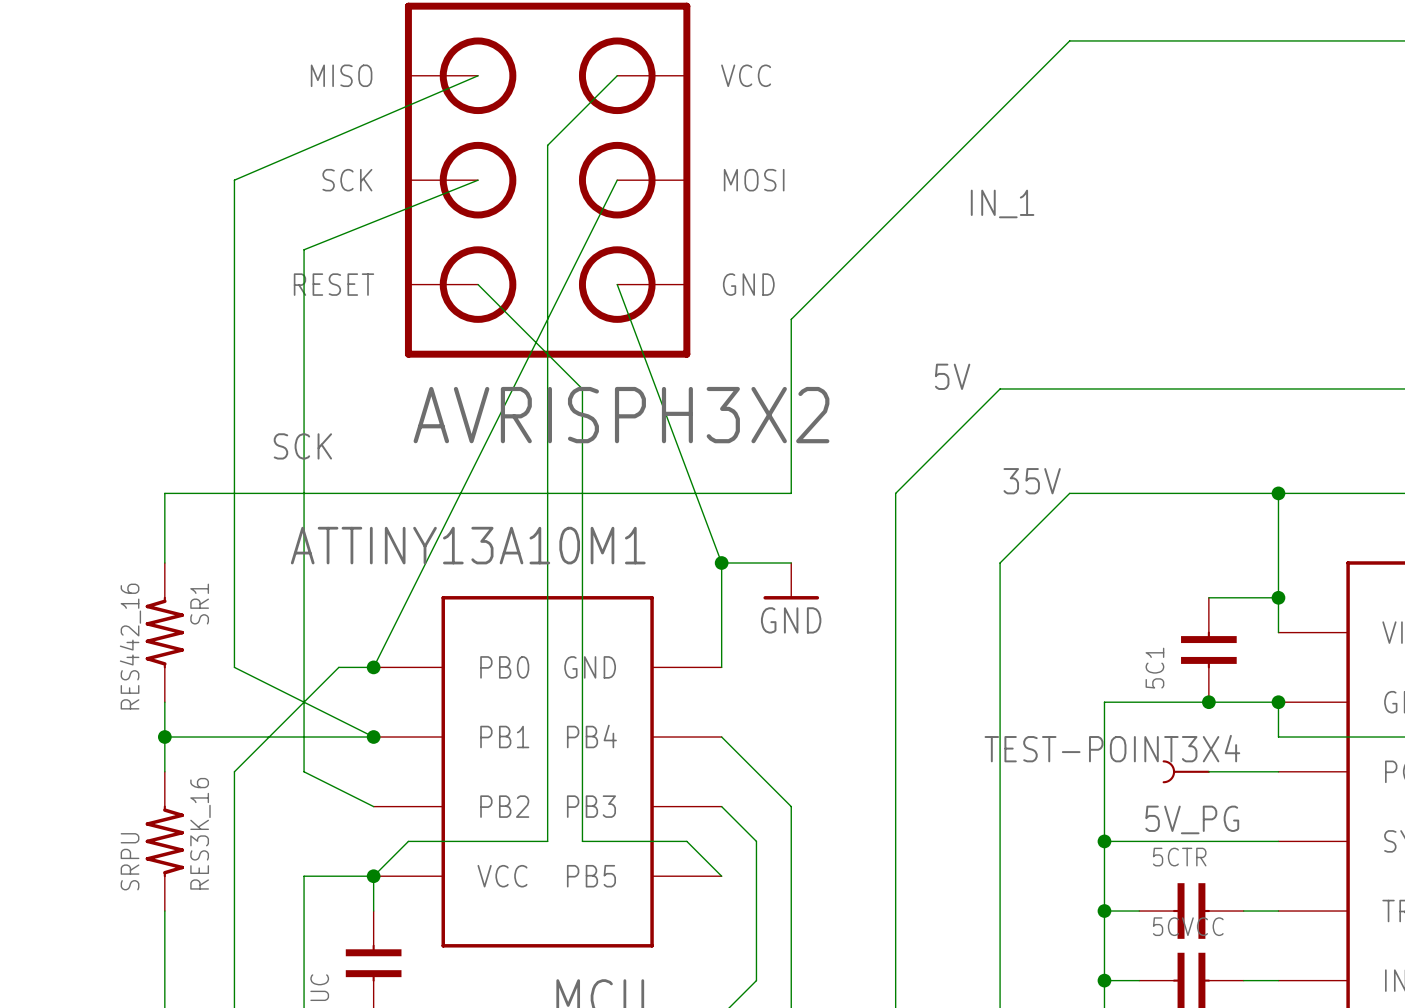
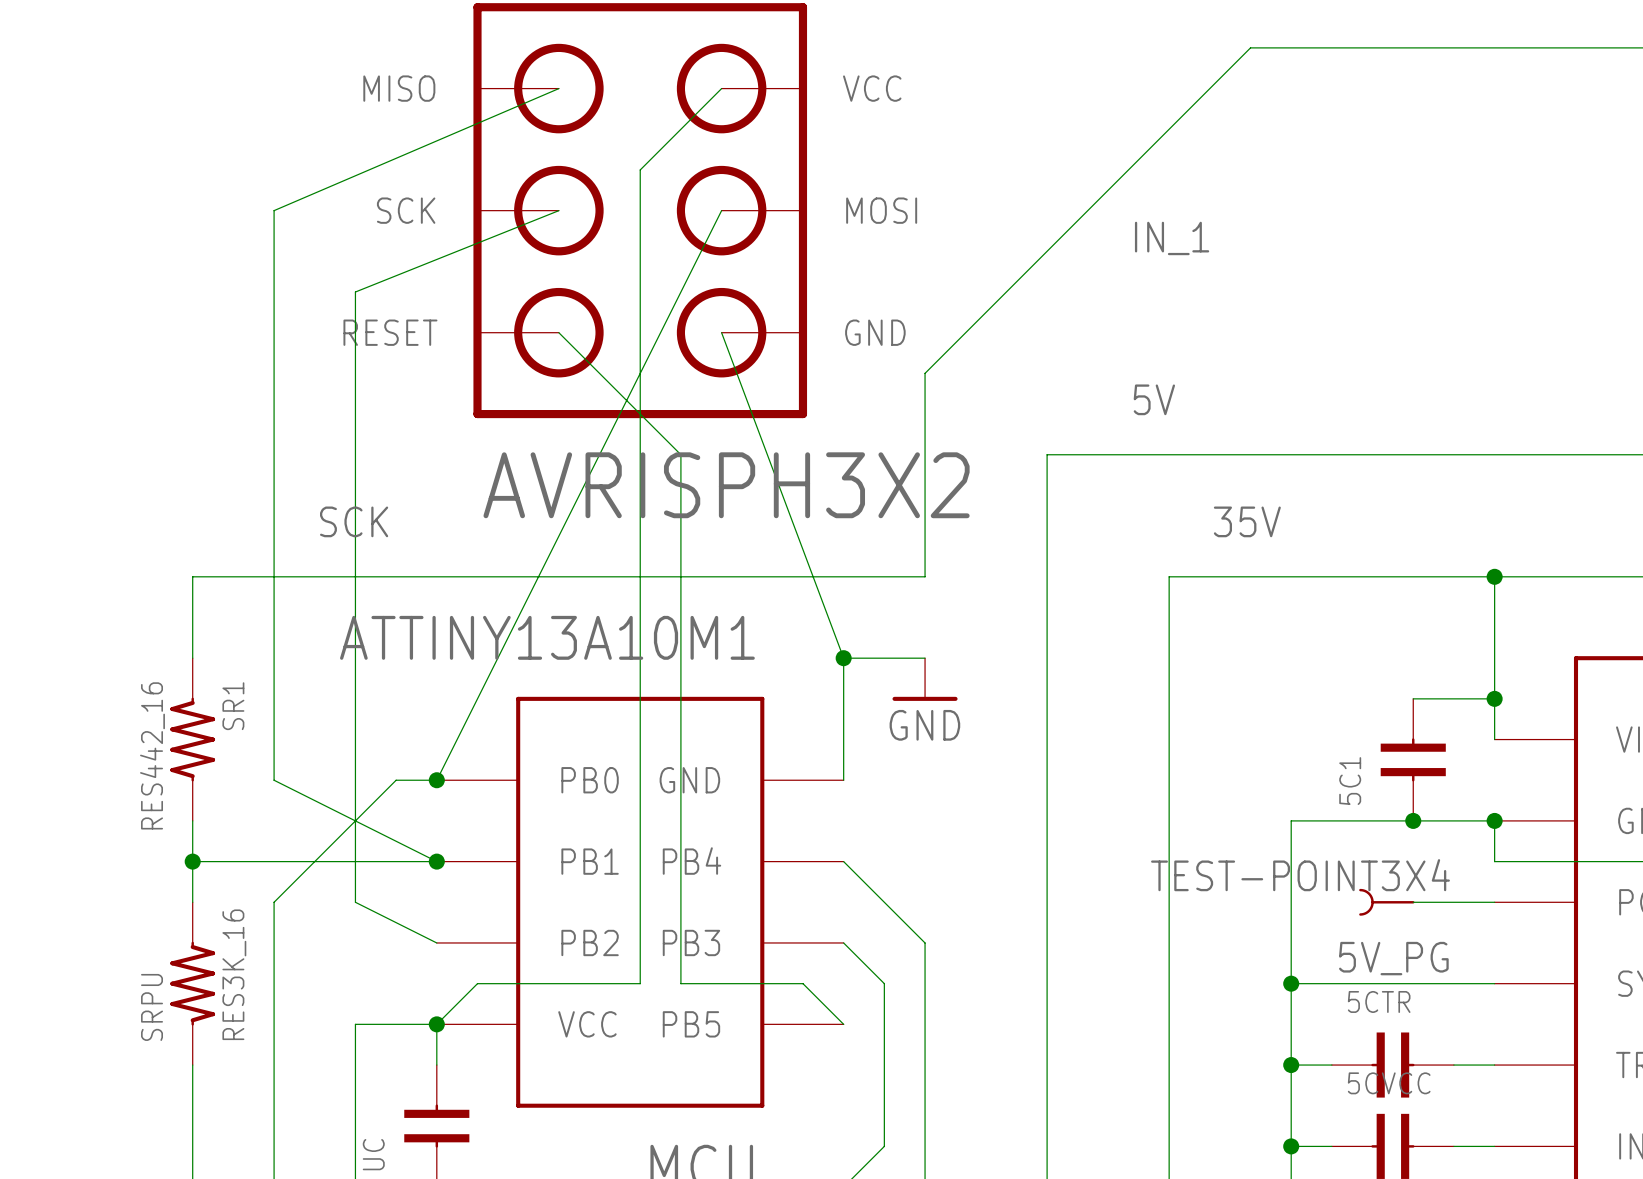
label position: 5V (952, 376) -> 5V (1154, 399)
wire: (1000, 388) (895, 493) -> (1169, 454) (1047, 454) (1047, 576)
label position: 35V (1032, 481) -> 35V (1247, 521)
wire: (1069, 493) (1000, 562) -> (1250, 576) (1169, 576) (1169, 658)

